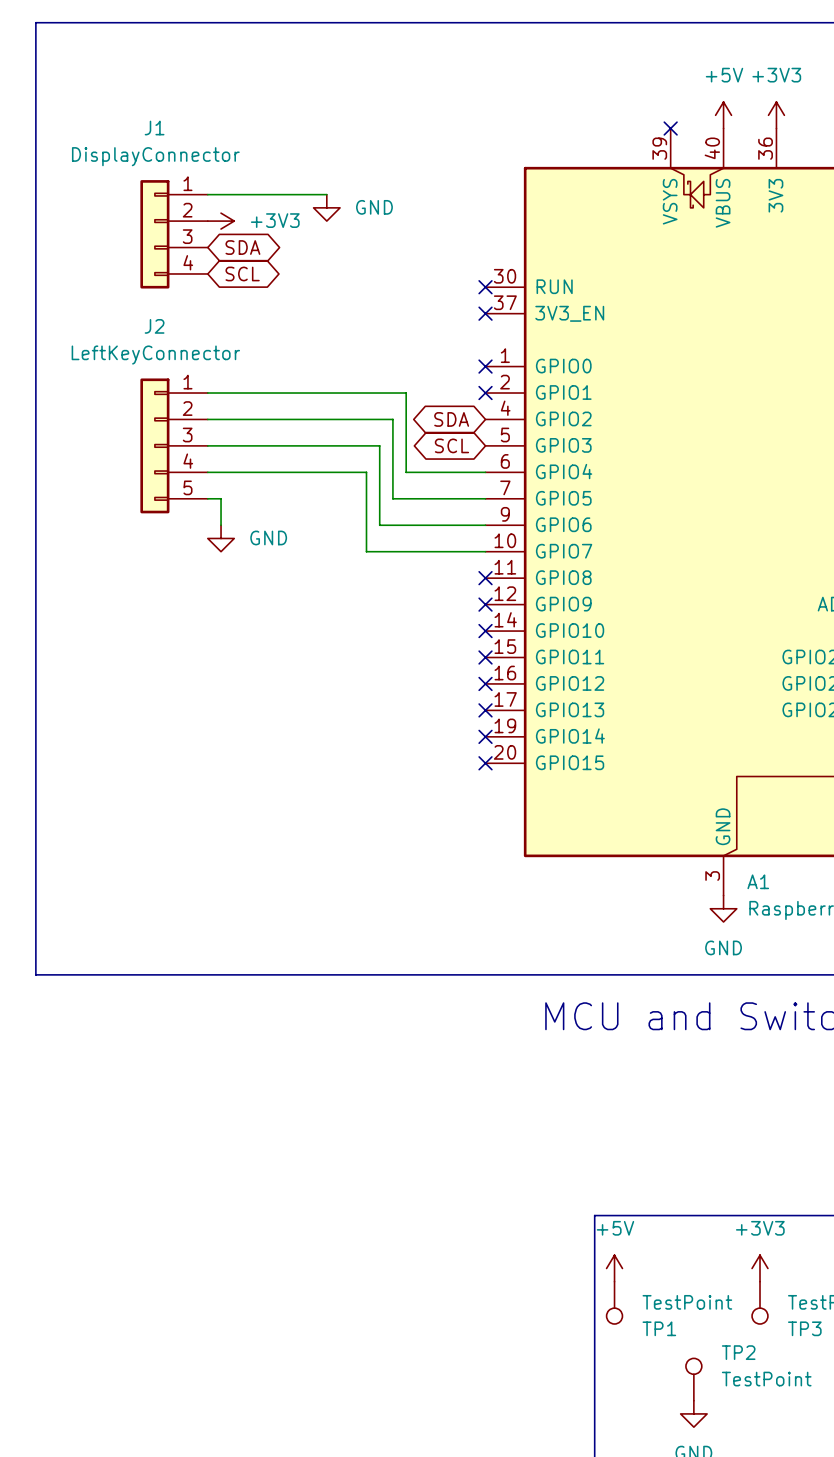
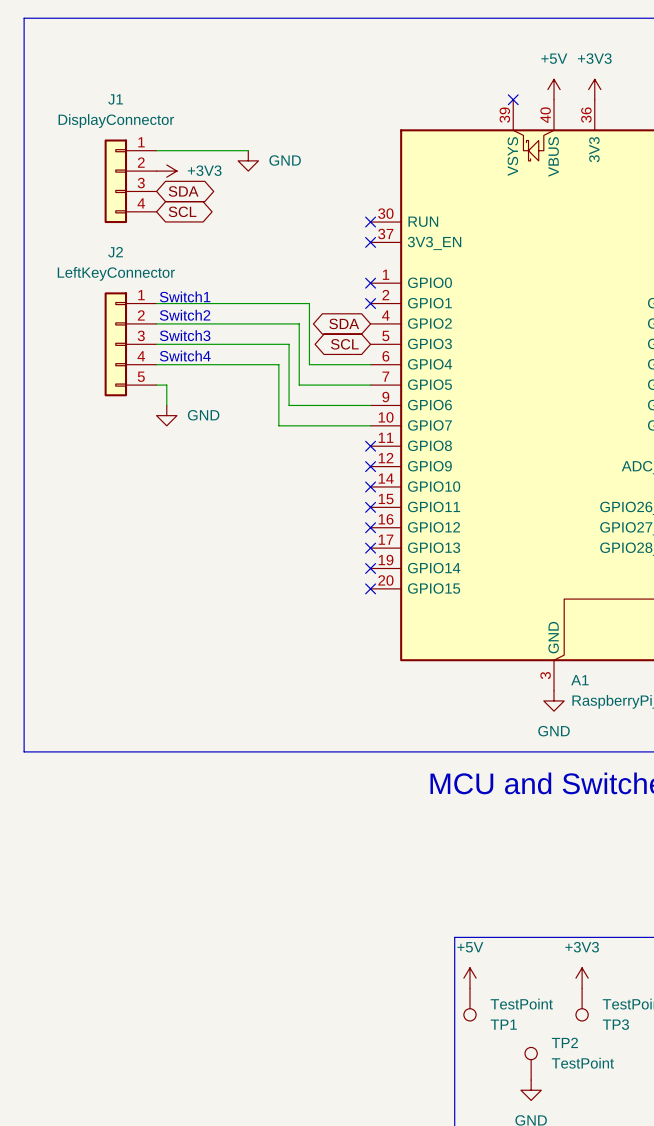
text: none -> Switch1 (185, 296)
text: none -> Switch2 (185, 315)
text: none -> Switch3 (185, 335)
text: none -> Switch4 (185, 355)

